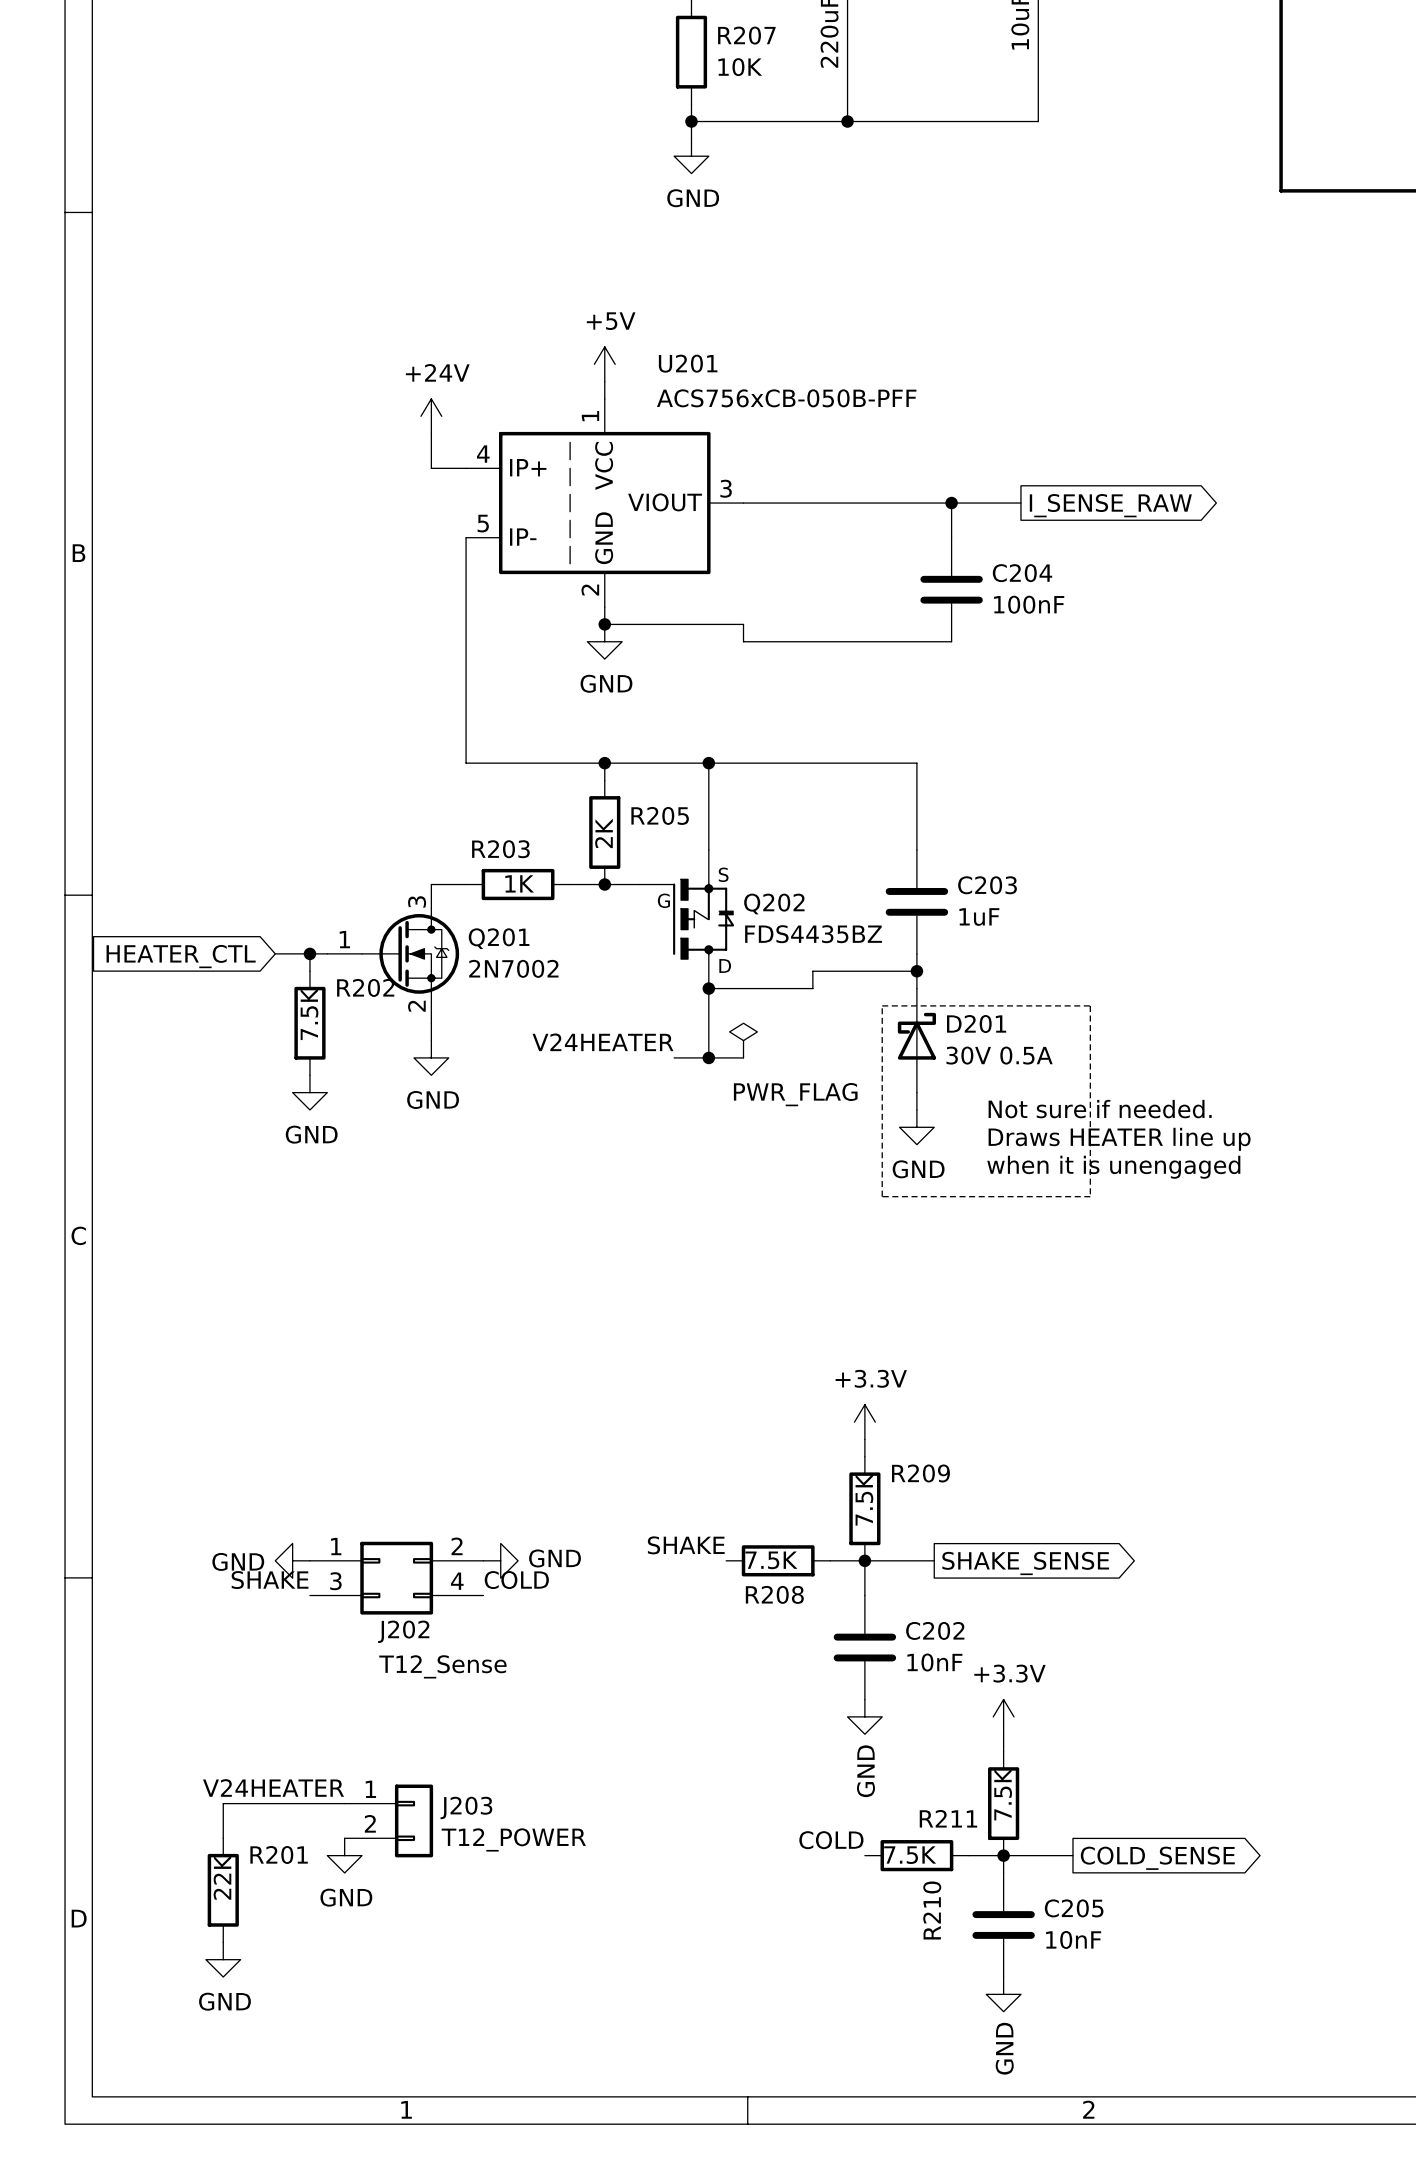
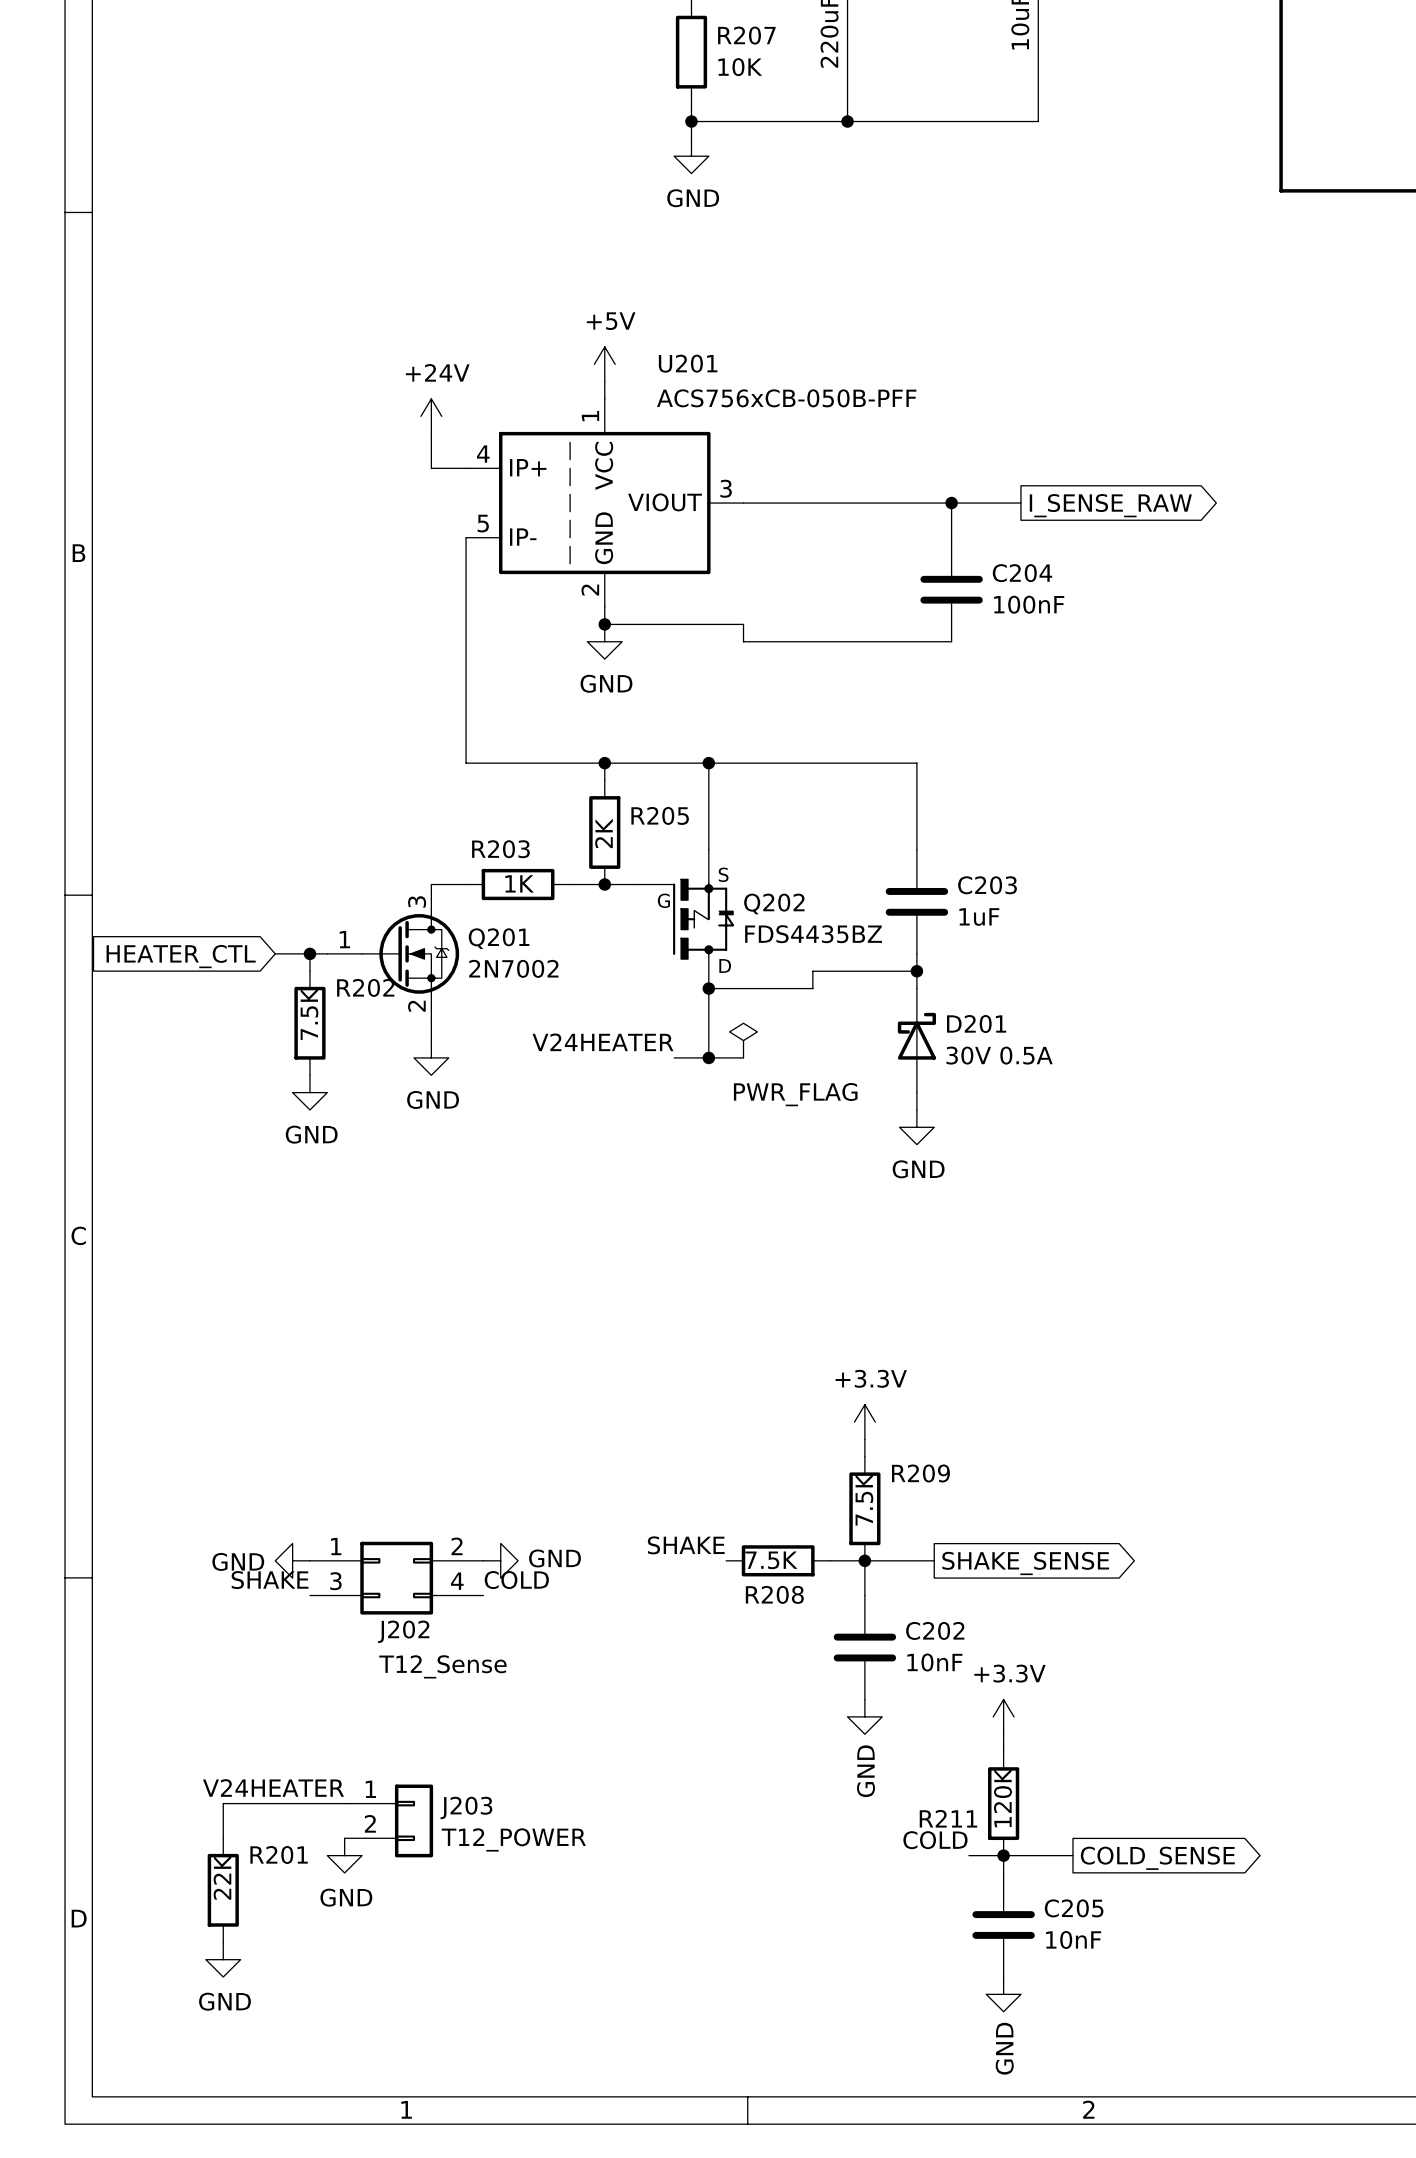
line: (882, 1005) (1090, 1005) (1090, 1196) (882, 1196) (882, 1005) -> none
text: Not sure if needed. (1100, 1109) -> none
text: Draws HEATER line up (1119, 1139) -> none
text: when it is unengaged (1113, 1167) -> none
R211 value: 7.5K (1003, 1794) -> 120K (1002, 1797)
label position: COLD (831, 1840) -> COLD (935, 1840)
R210: 7.5K (916, 1855) -> none

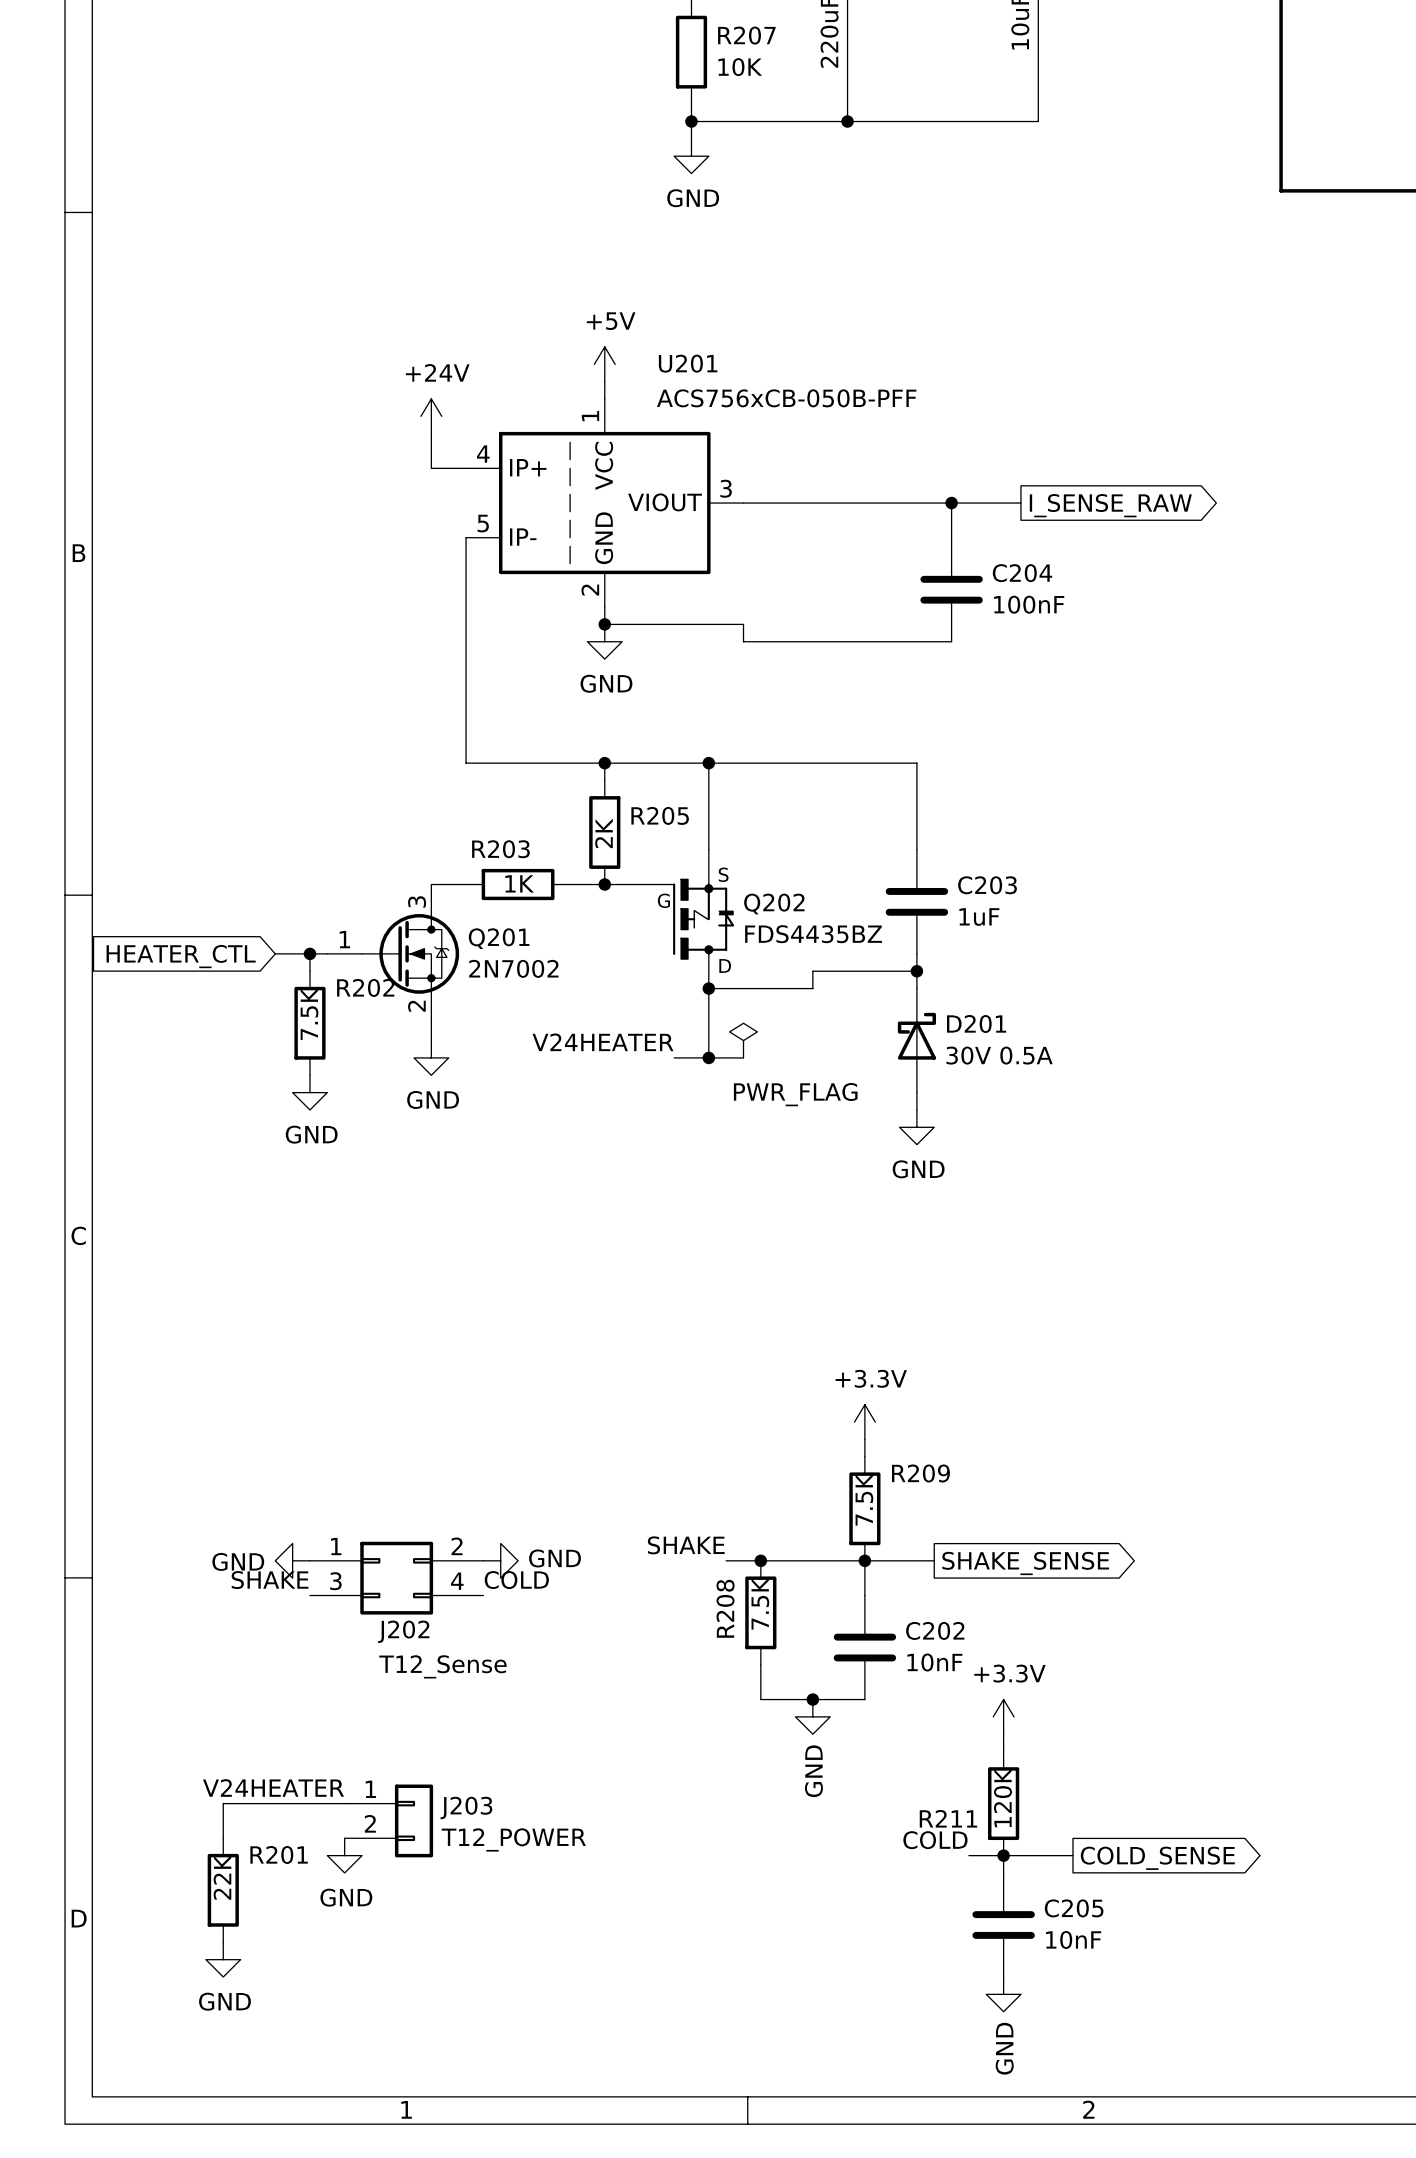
wire: none -> (726, 1560) (830, 1560)
junction: none -> (760, 1560)
R208 rotation: 0° (778, 1560) -> 90° clockwise (760, 1612)
wire: none -> (760, 1664) (760, 1699) (864, 1699)
junction: none -> (812, 1699)
power symbol position: GND (864, 1716) -> GND (812, 1716)

